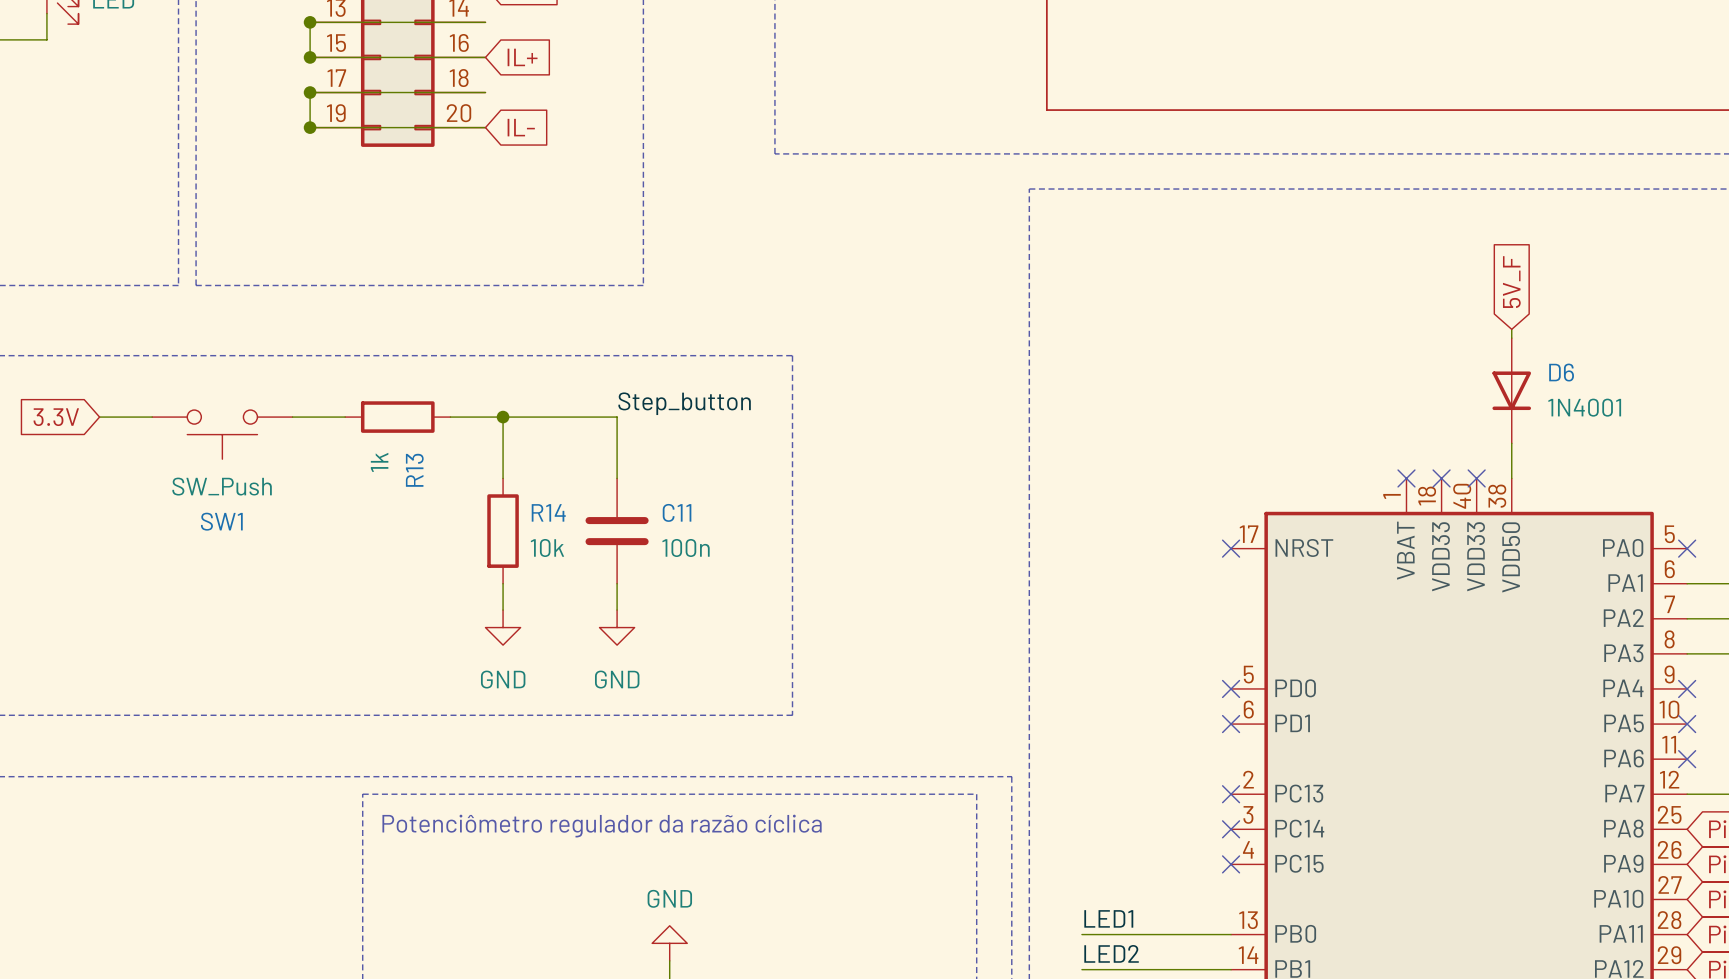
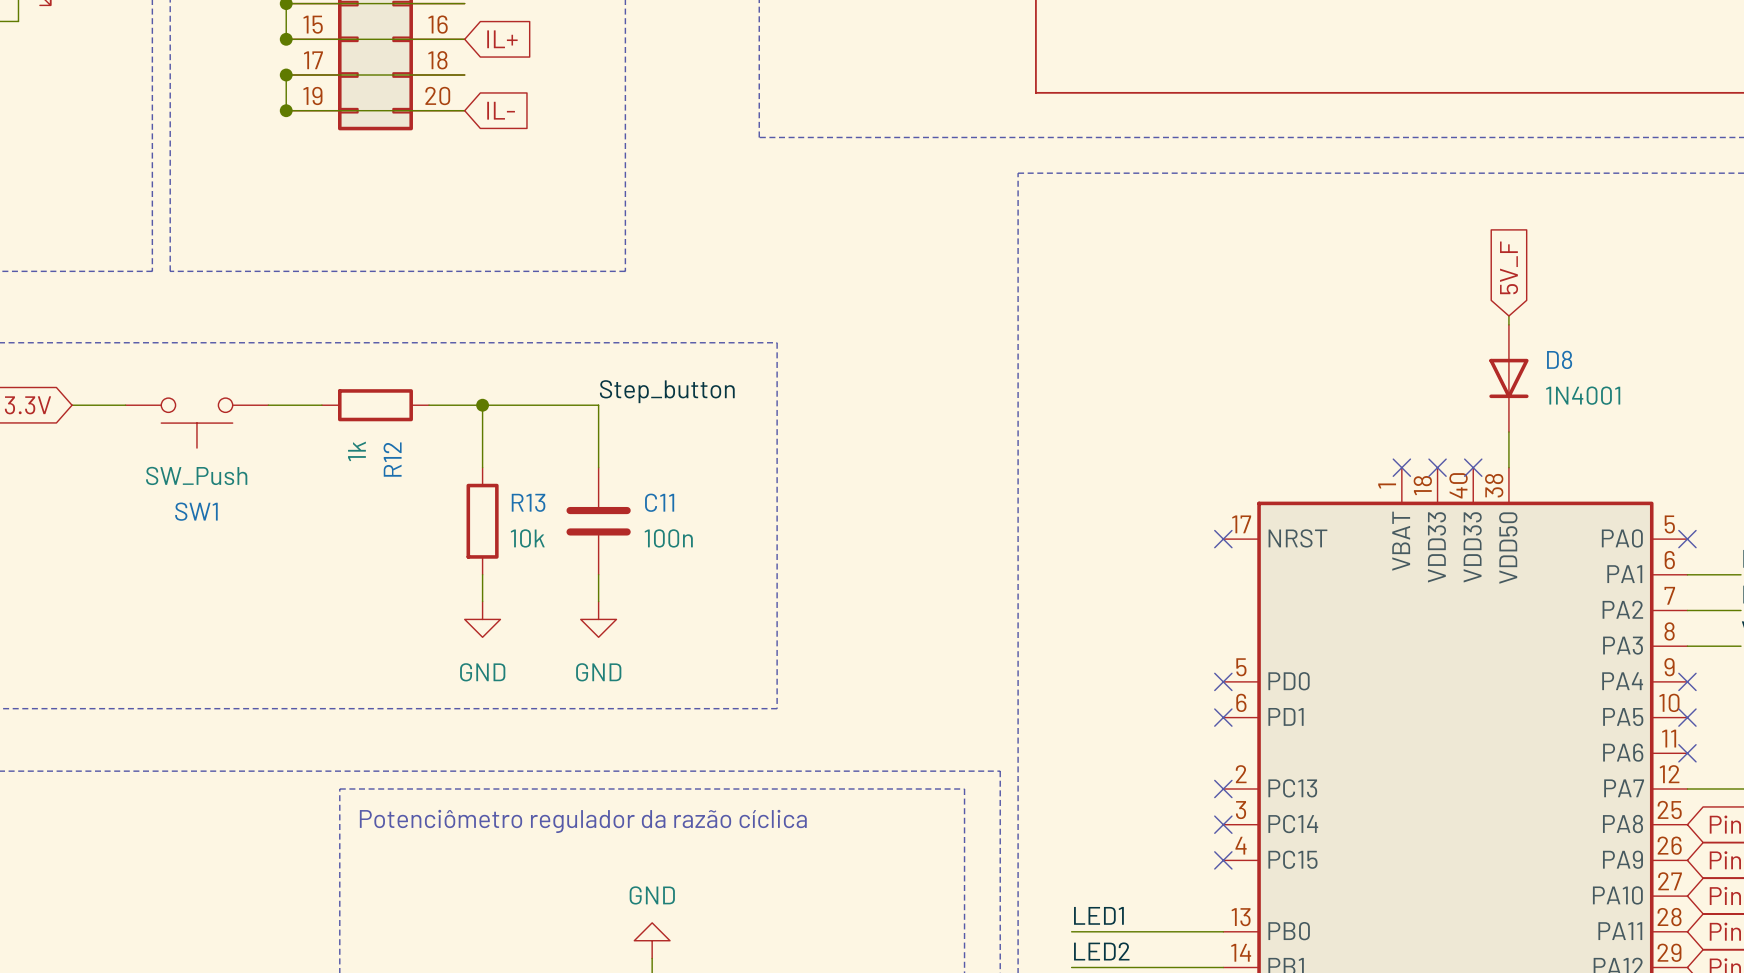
D6 name: D6 (1561, 372) -> D8 (1559, 359)
R13 name: R13 (414, 470) -> R12 (392, 459)
R14 name: R14 (548, 512) -> R13 (528, 502)

